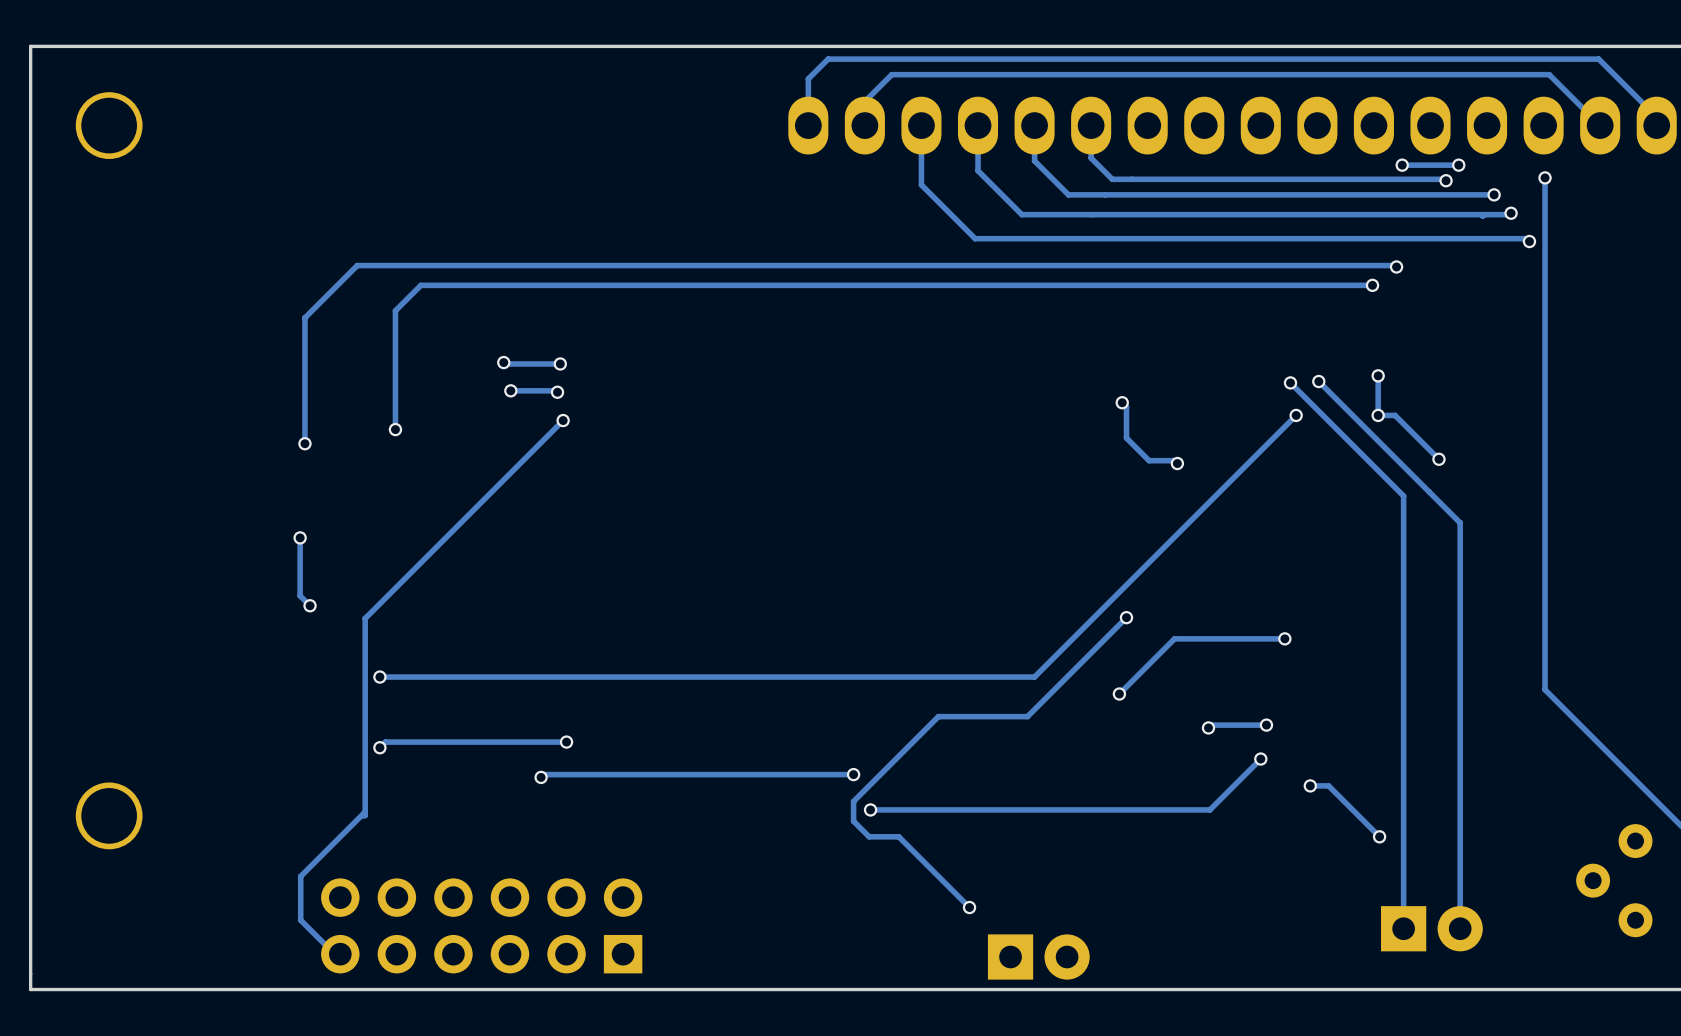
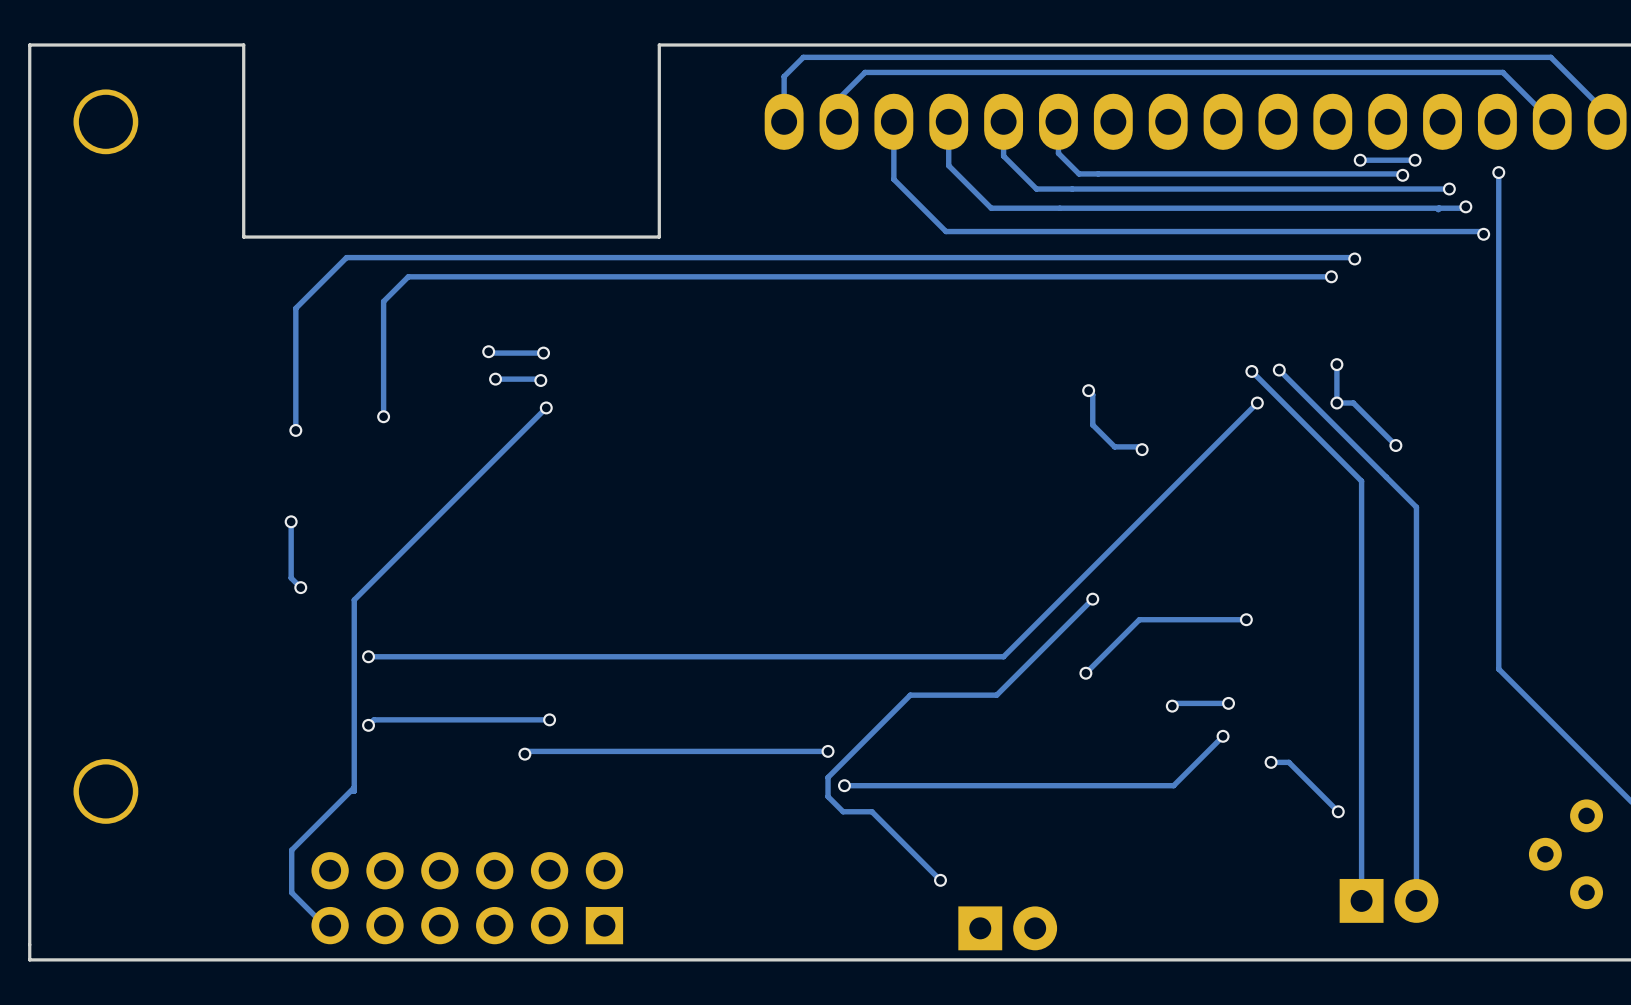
board edge: (679, 46) (251, 46) -> (659, 45) (659, 237) (243, 237) (243, 45)

